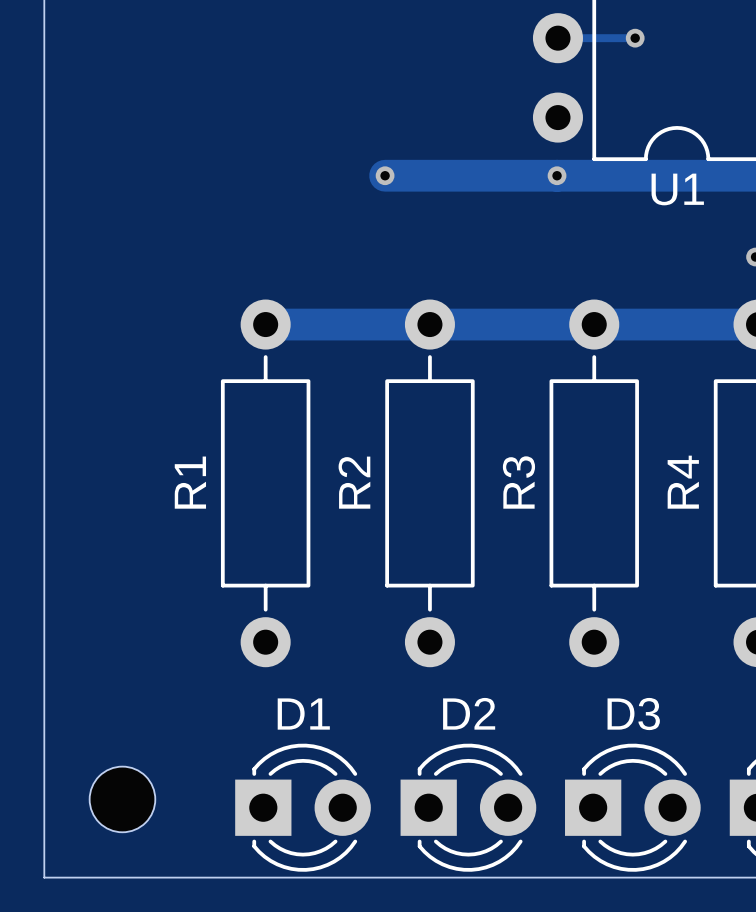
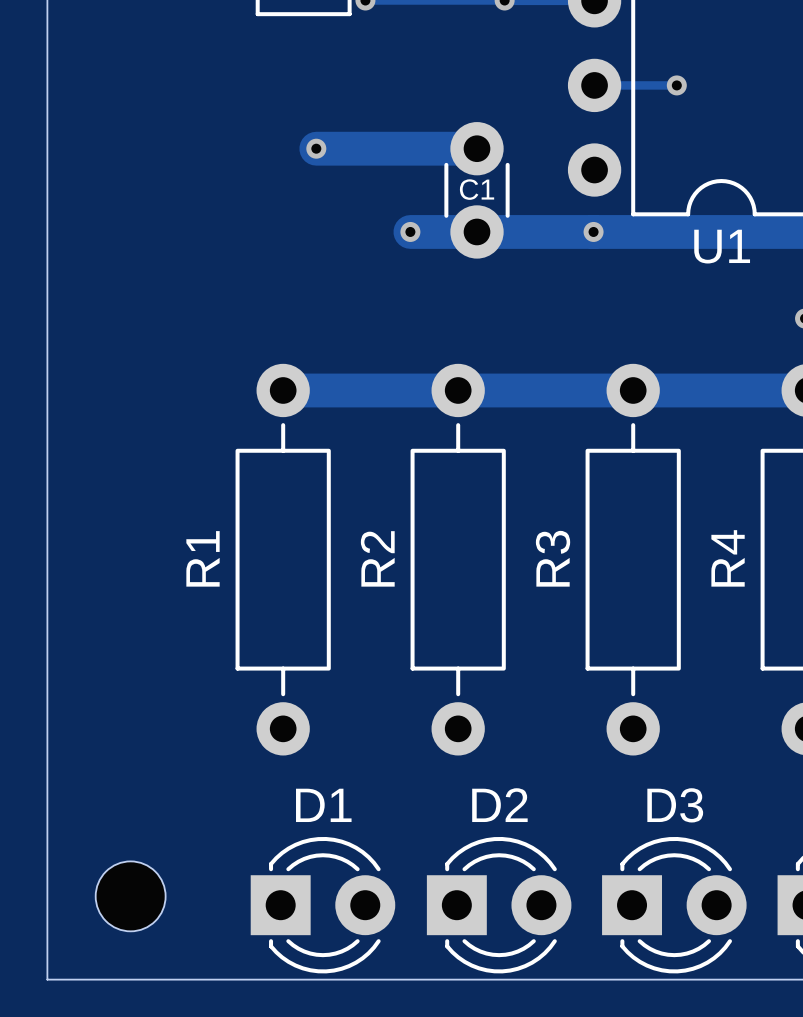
track: none -> (316, 148) (477, 148)
via: none -> (316, 148)
C1: none -> (477, 190)

